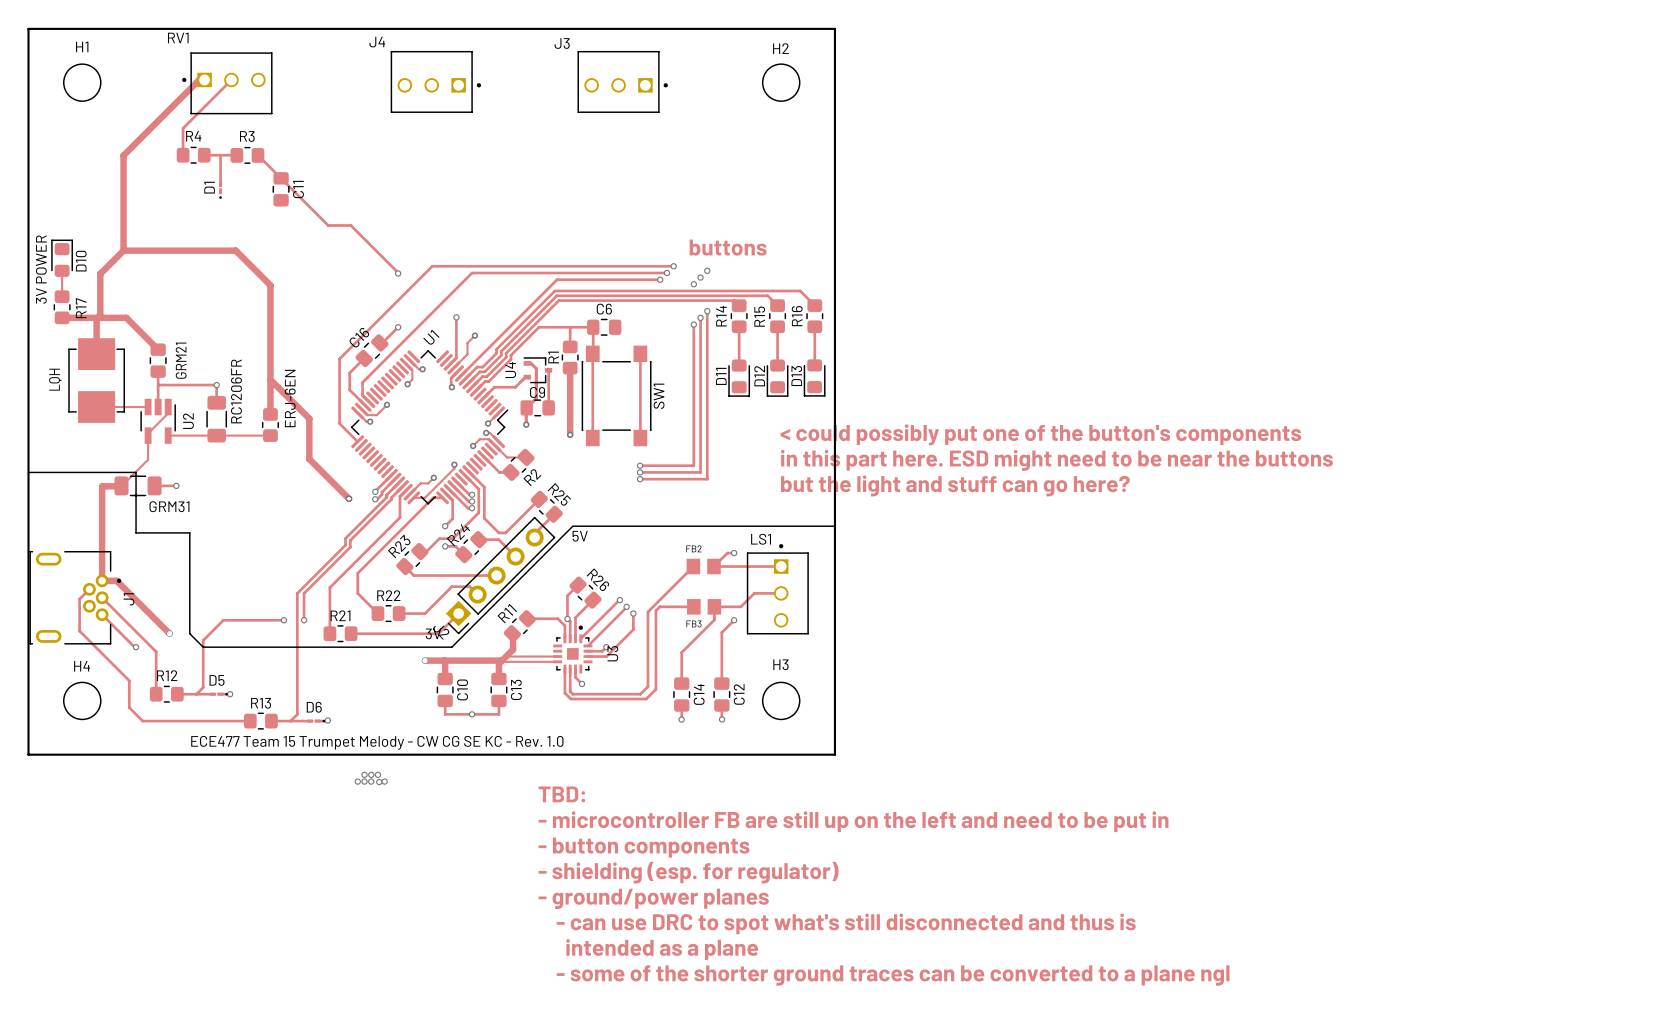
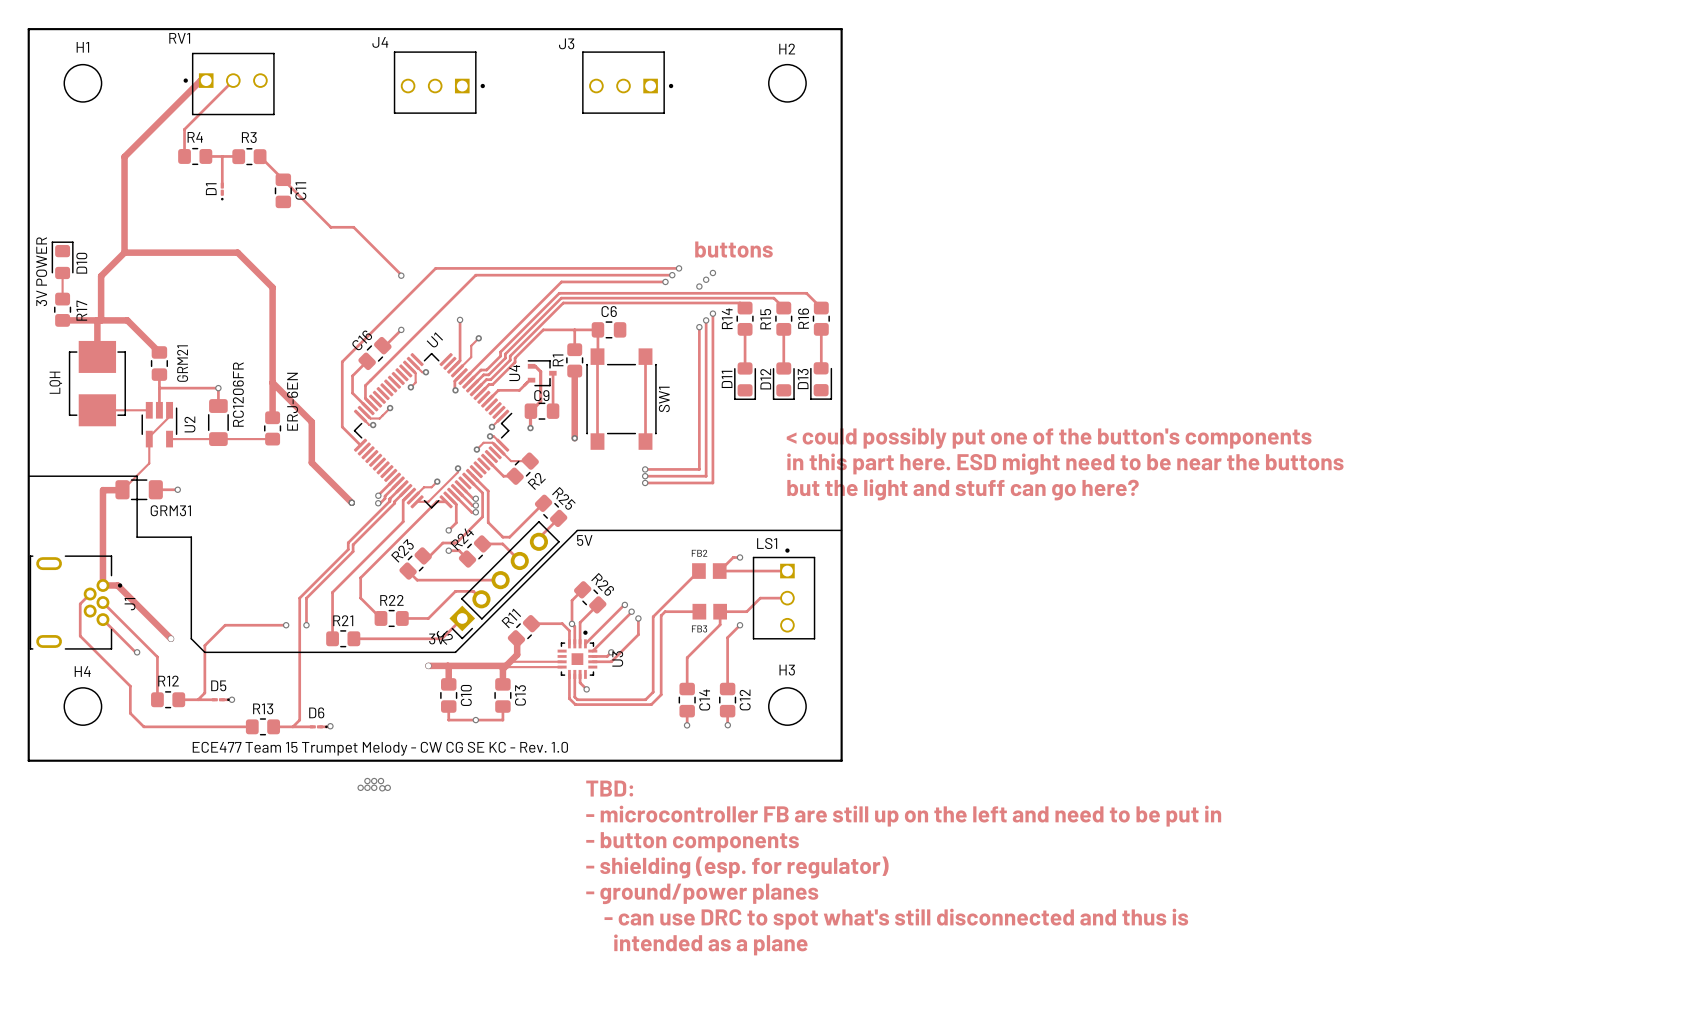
text position: TBD: (561, 794) -> TBD: (609, 788)
text position: - microcontroller FB are still up on the left and need to be put in (853, 821) -> - microcontroller FB are still up on the left and need to be put in (903, 816)
text position: - button components (644, 847) -> - button components (692, 842)
text position: - shielding (esp. for regulator) (688, 872) -> - shielding (esp. for regulator) (737, 867)
text position: - ground/power planes (653, 898) -> - ground/power planes (702, 893)
text position: - can use DRC to spot what's still disconnected and thus is (846, 923) -> - can use DRC to spot what's still disconnected and thus is (896, 919)
text position: intended as a plane (662, 949) -> intended as a plane (710, 944)
text: - some of the shorter ground traces can be converted to a plane ngl (893, 975) -> none

